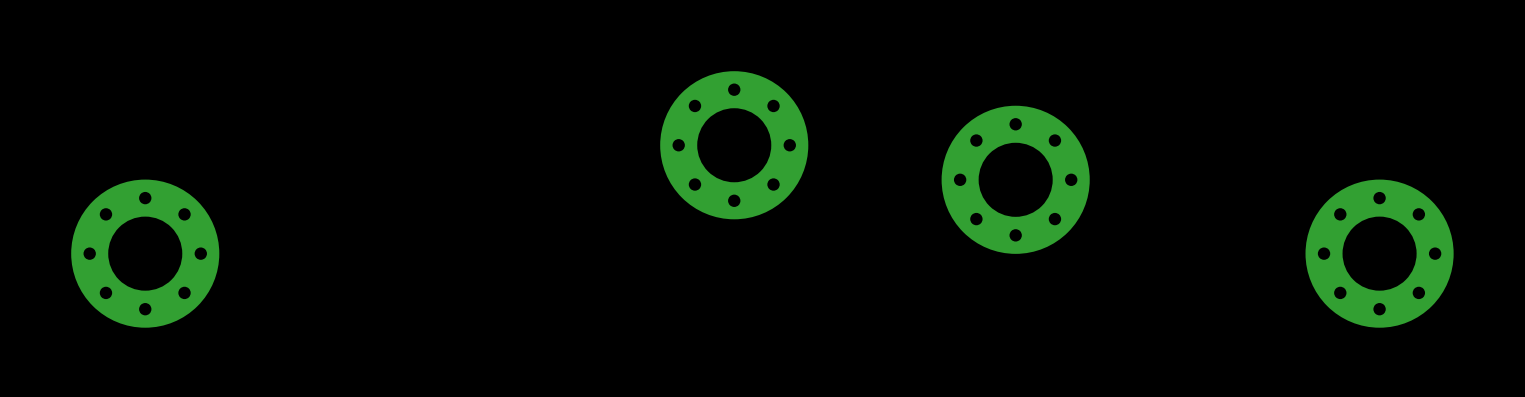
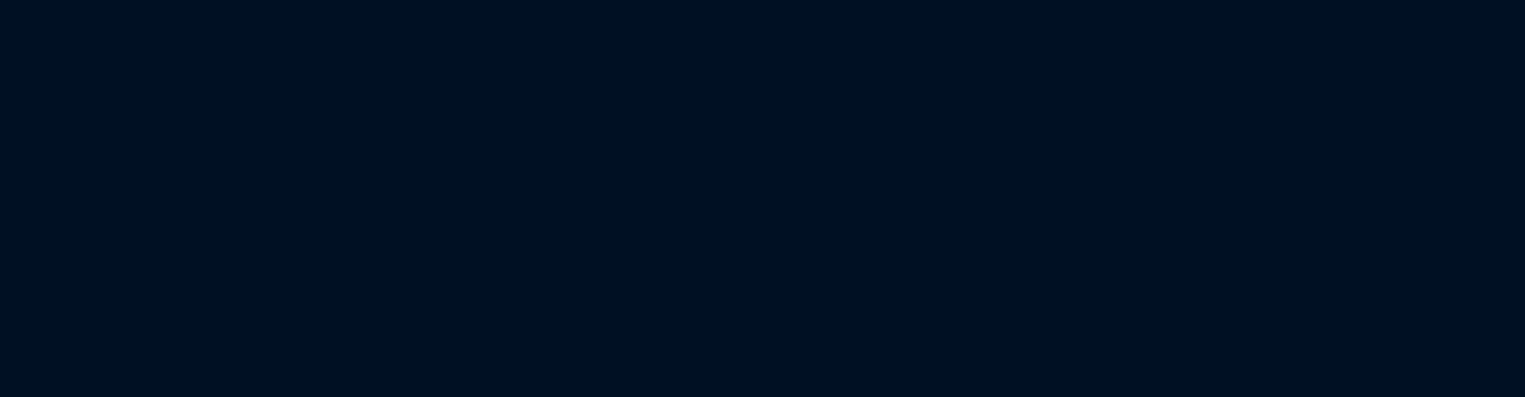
part: (734, 145) -> none
part: (1015, 179) -> none
part: (145, 253) -> none
part: (1379, 253) -> none

